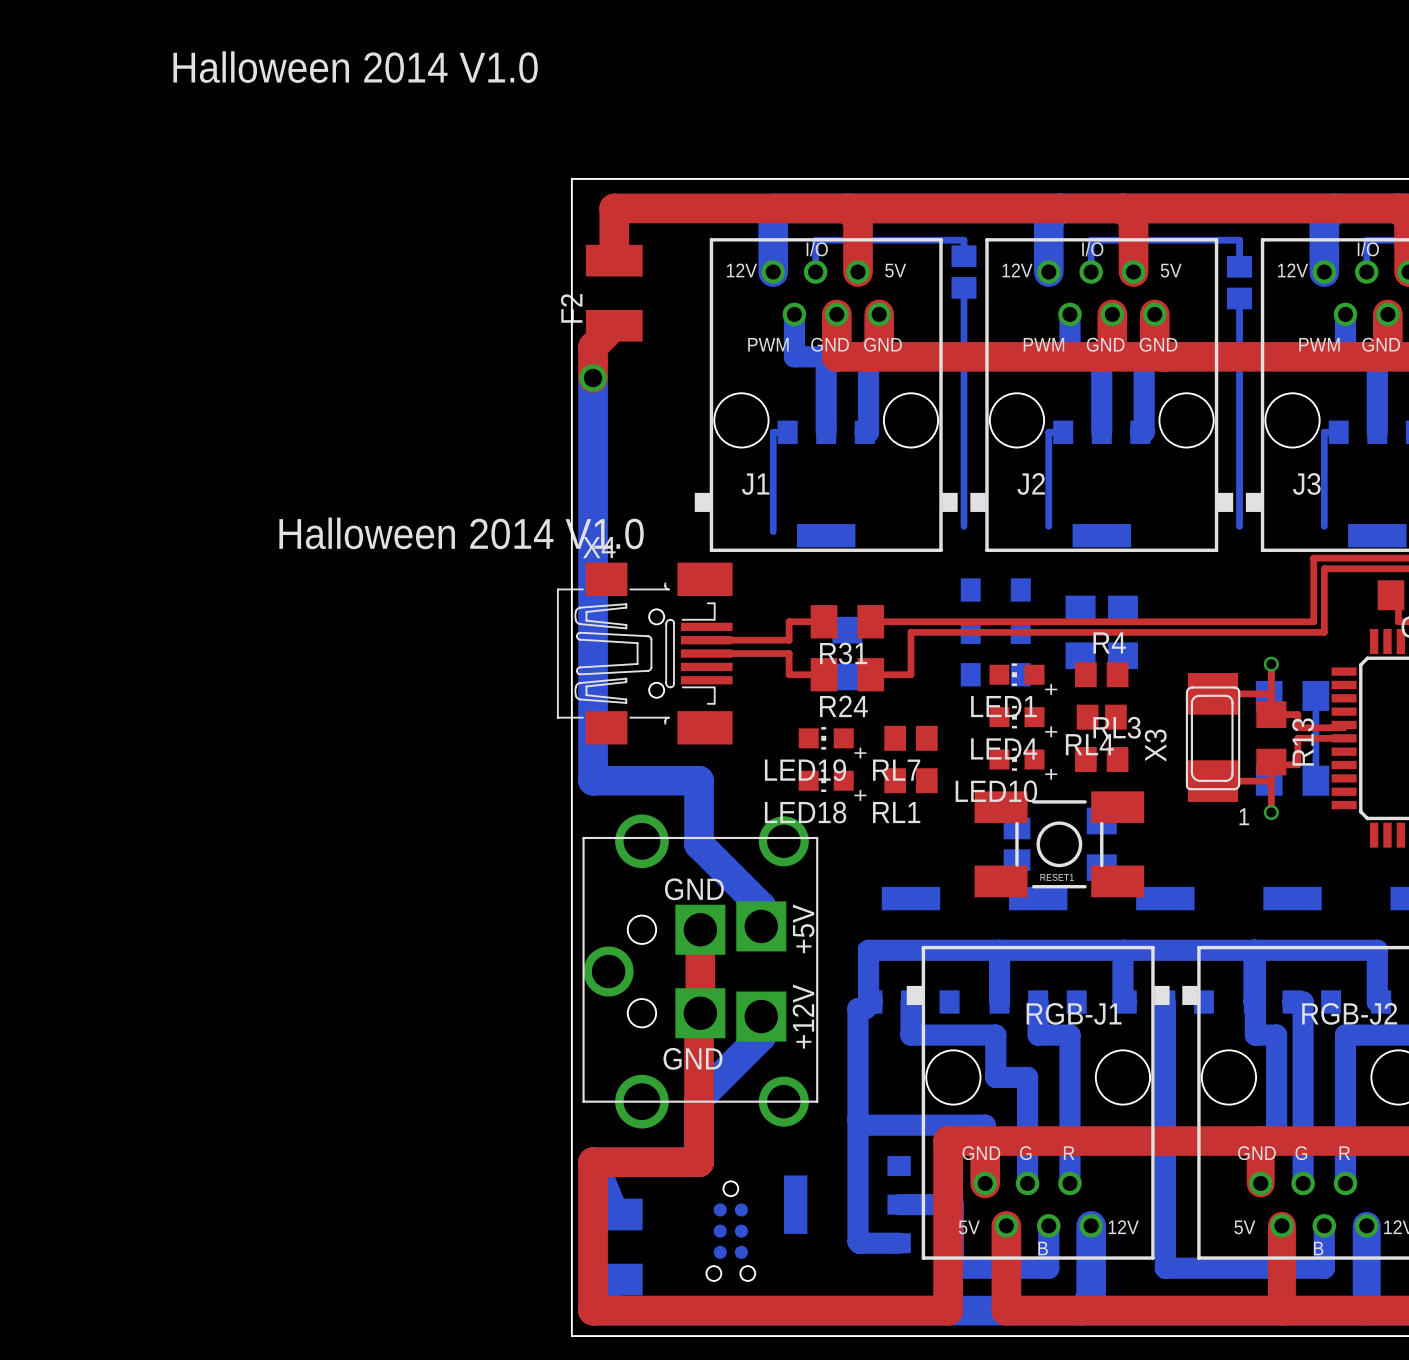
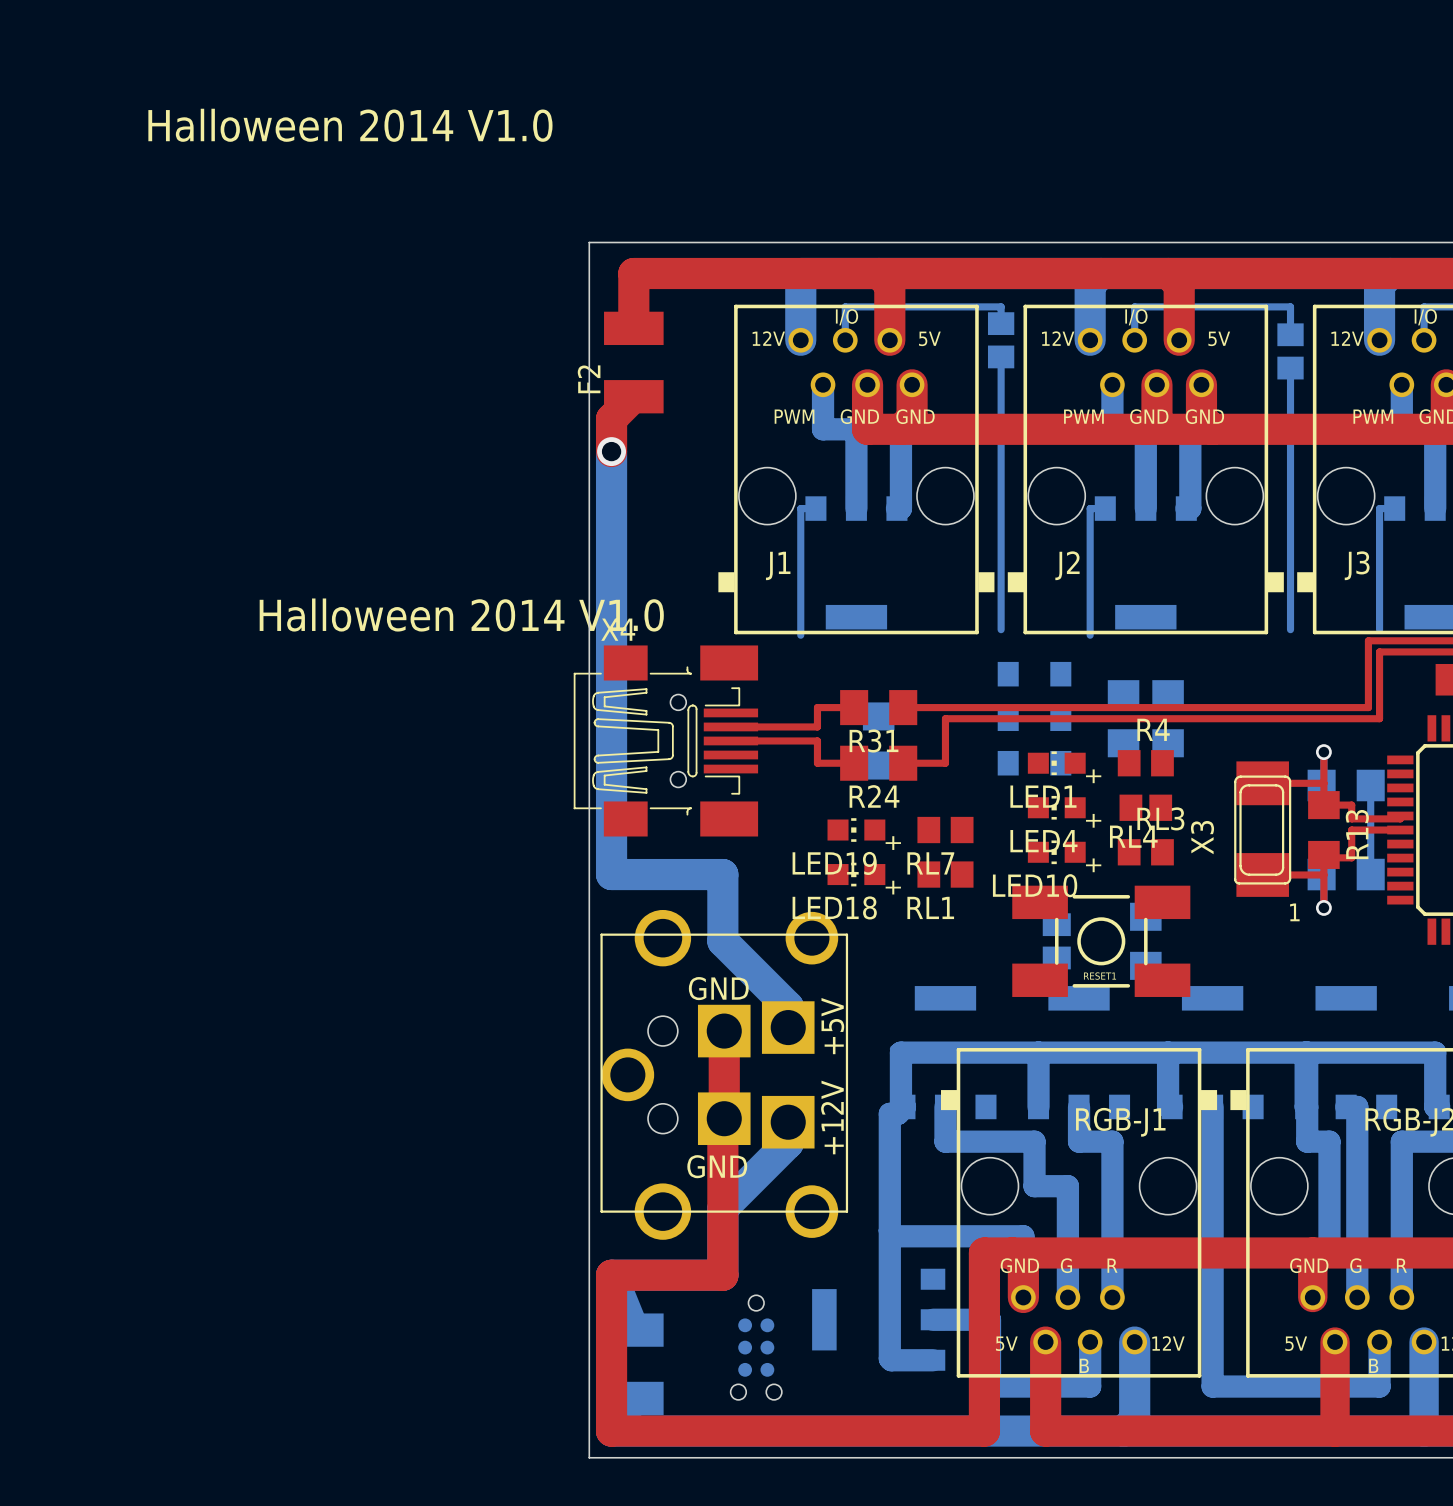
bottom track: none -> (1001, 607) (1001, 629)
bottom track: none -> (1090, 607) (1090, 635)
bottom track: none -> (1290, 607) (1290, 629)
bottom track: none -> (1379, 607) (1379, 629)
bottom track: none -> (800, 612) (800, 635)

